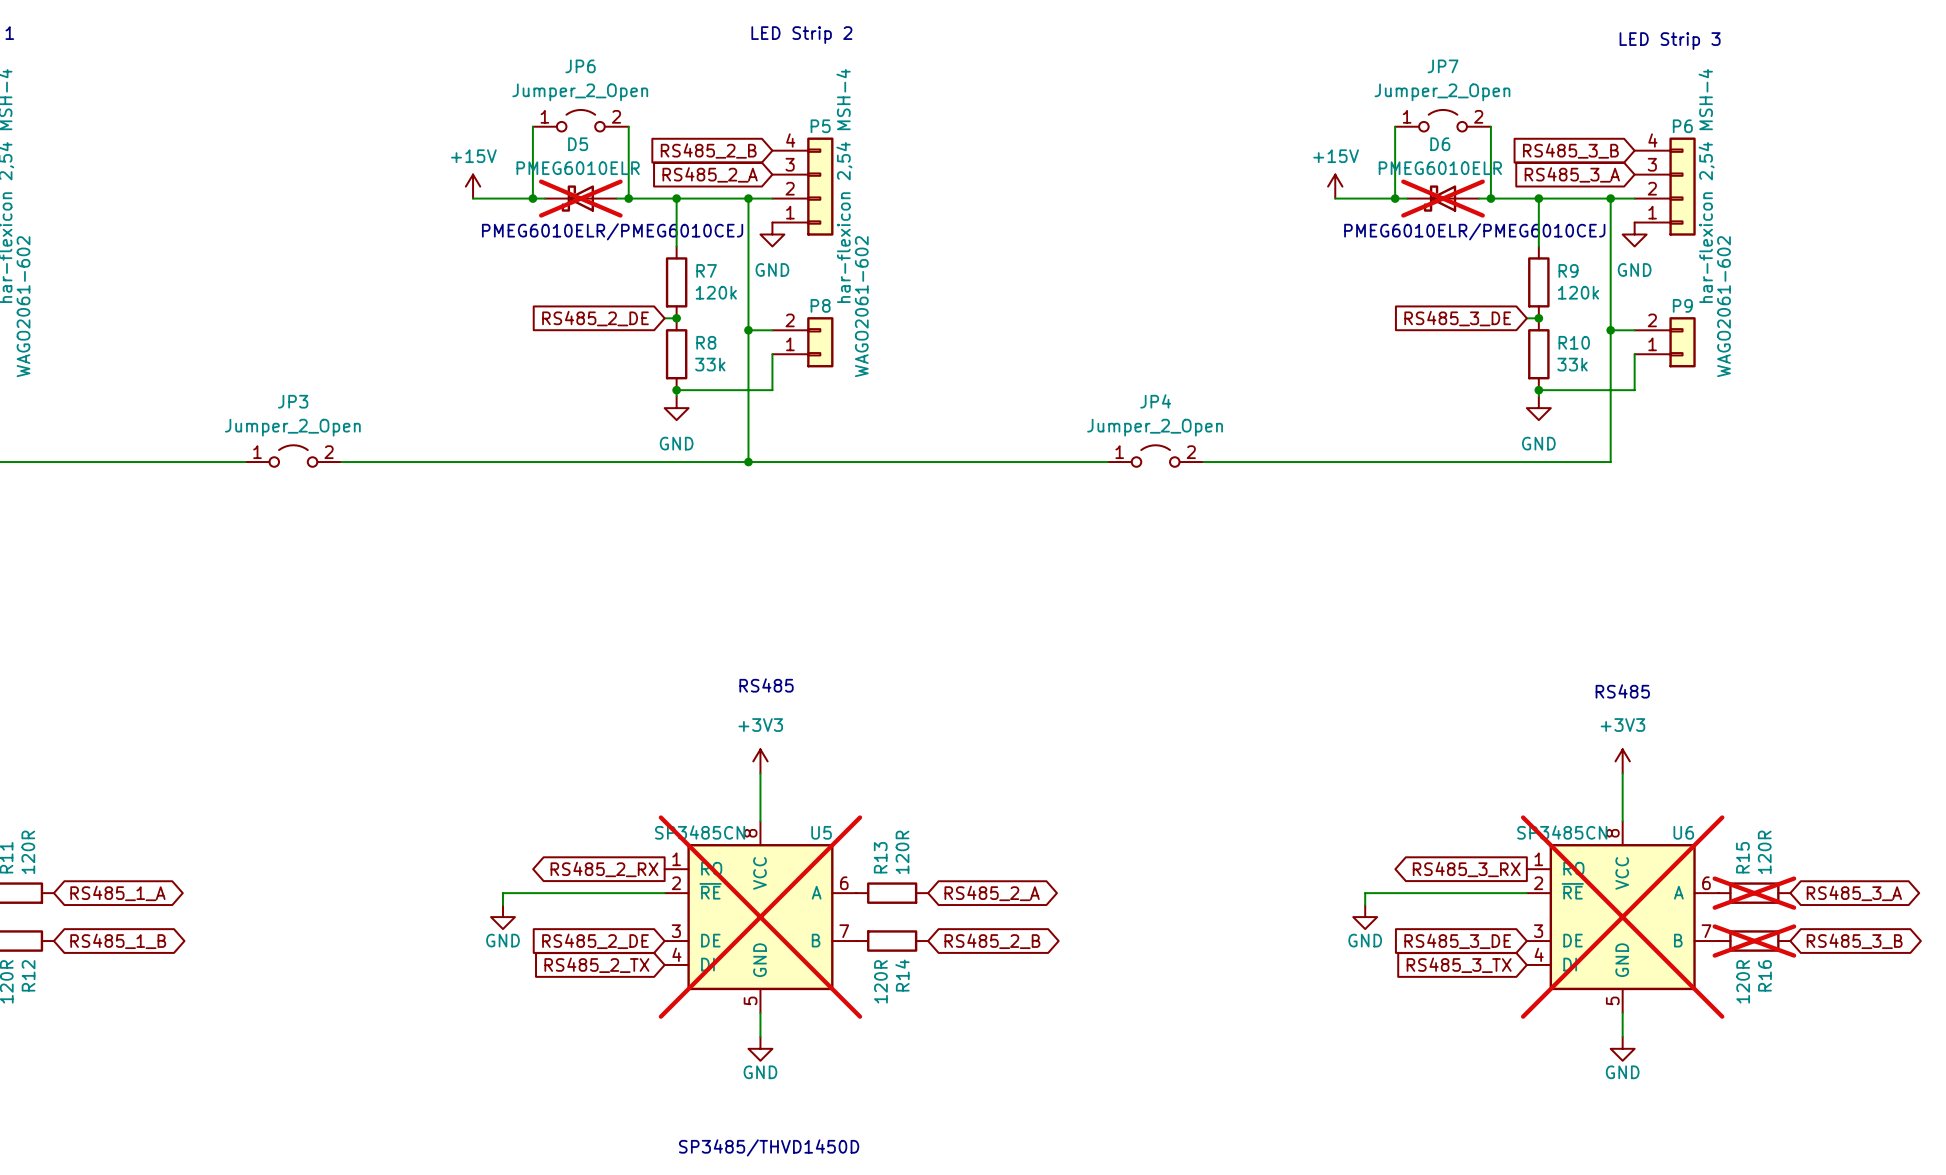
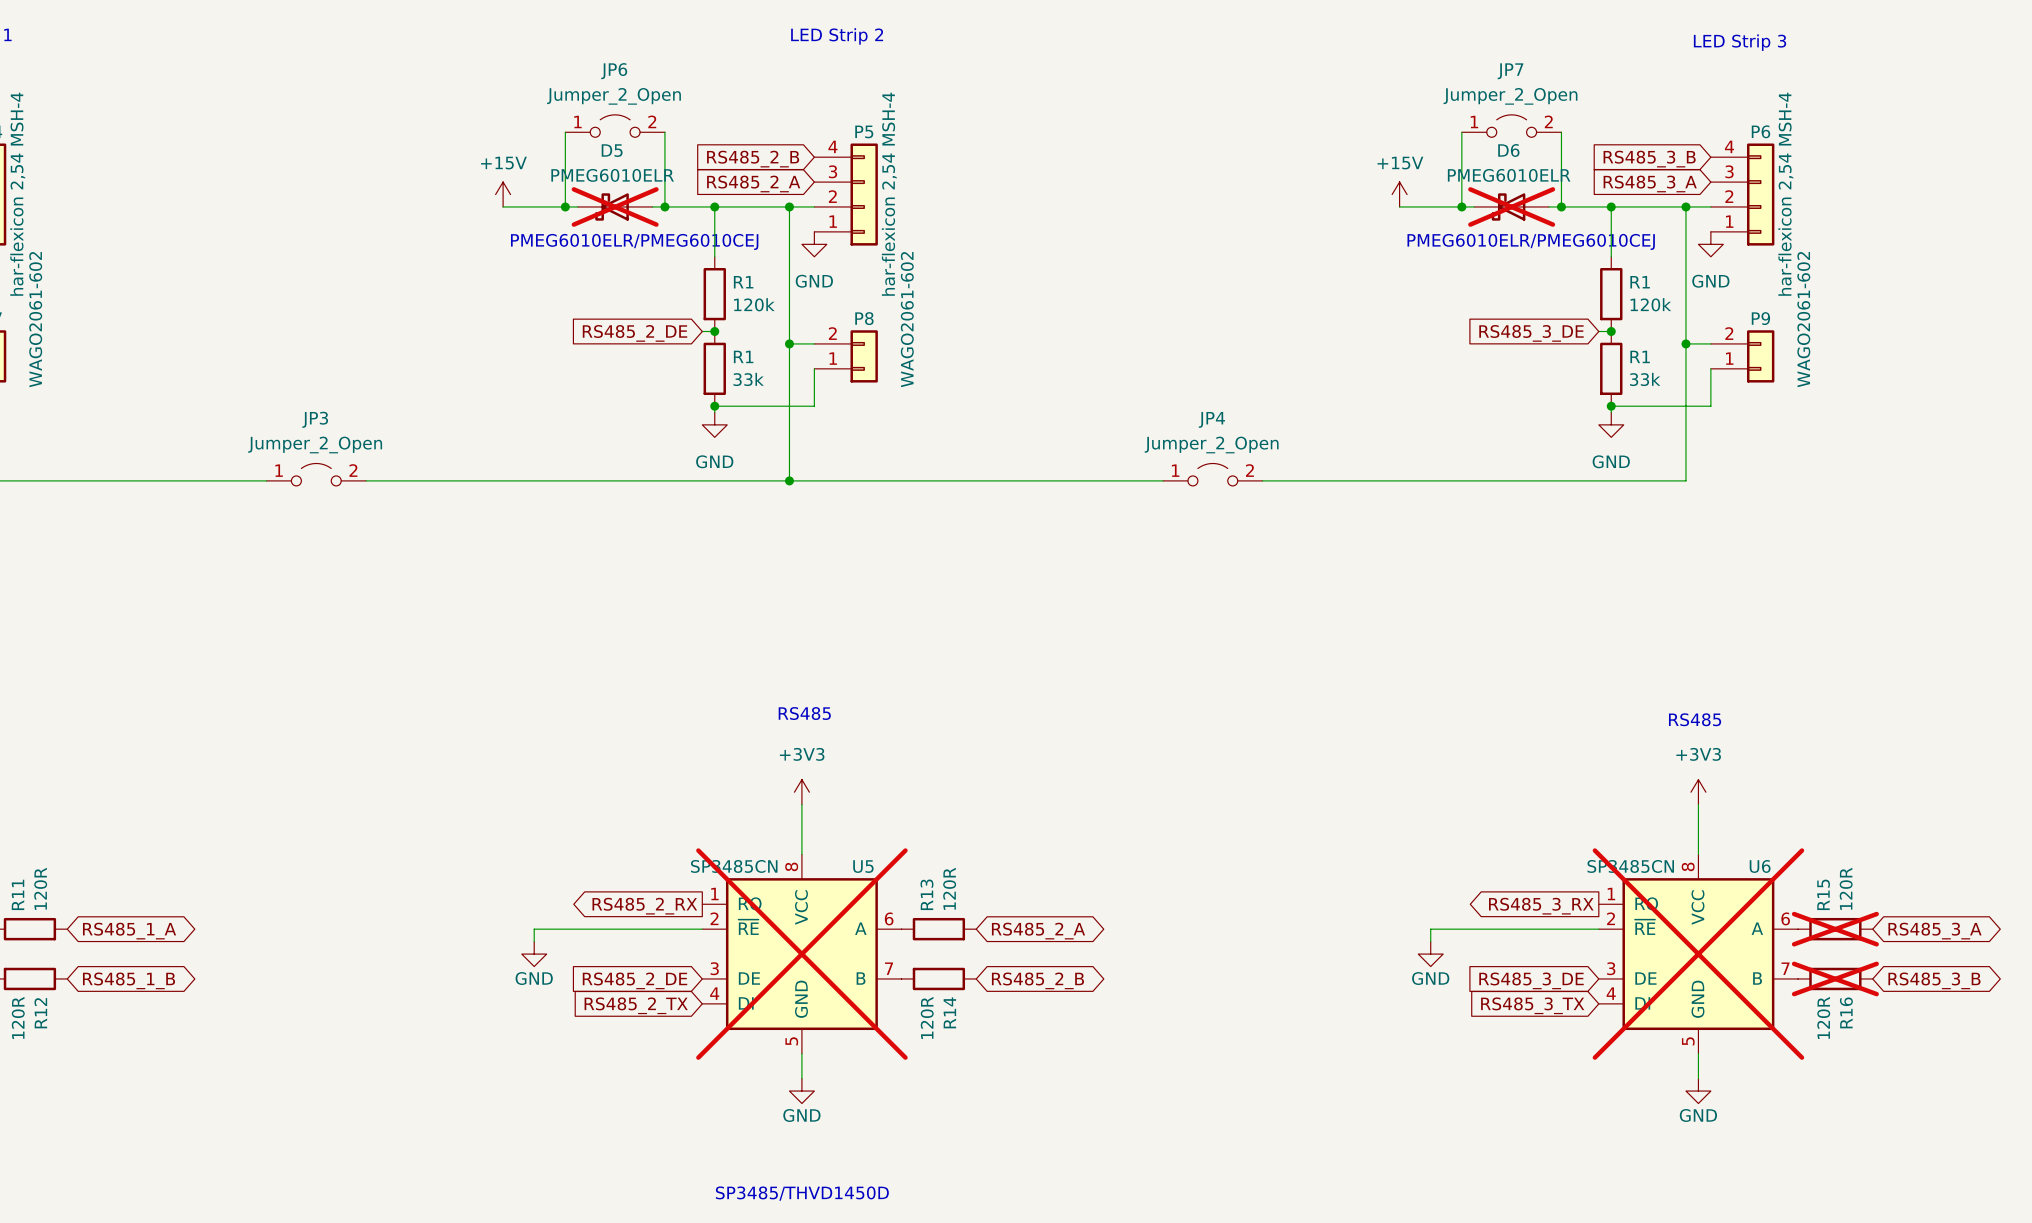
R7 name: R7 (706, 270) -> R1 (743, 282)
R9 name: R9 (1568, 270) -> R1 (1640, 282)
R8 name: R8 (706, 342) -> R1 (743, 356)
R10 name: R10 (1574, 342) -> R1 (1640, 356)

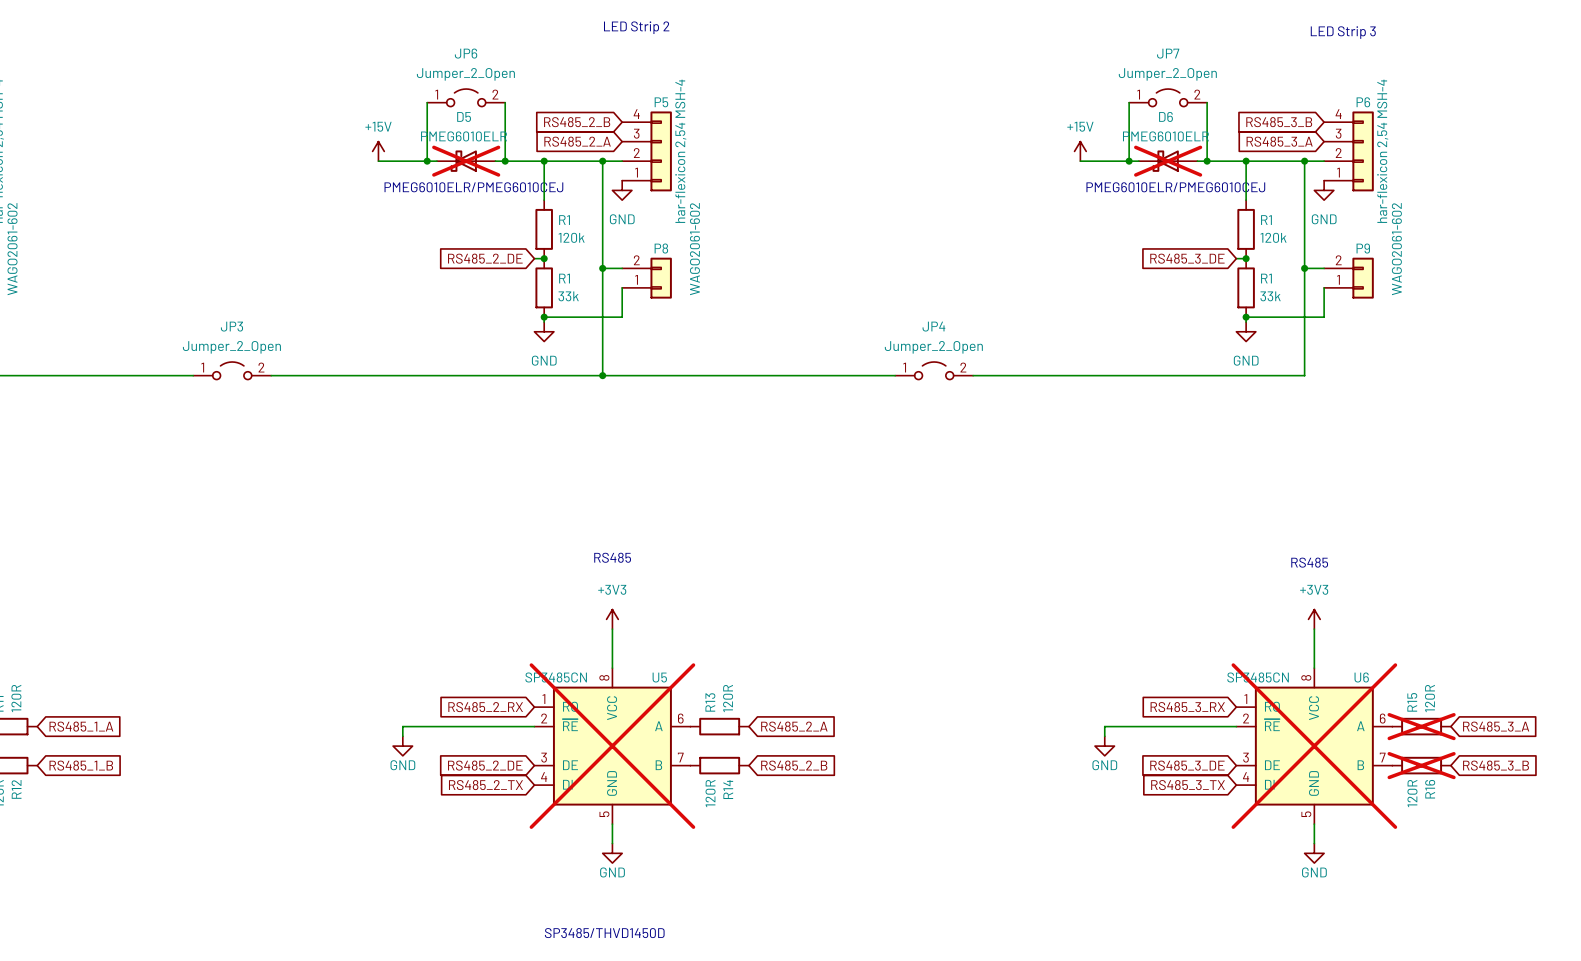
global label shape: output (644, 906) -> input (485, 707)
global label shape: output (1541, 906) -> input (1187, 707)
global label shape: bidirectional (129, 931) -> input (81, 726)
global label shape: bidirectional (1038, 931) -> input (794, 726)
global label shape: bidirectional (1934, 931) -> input (1496, 726)
global label shape: bidirectional (129, 980) -> input (81, 765)
global label shape: bidirectional (1037, 980) -> input (794, 765)
global label shape: bidirectional (1934, 980) -> input (1496, 765)

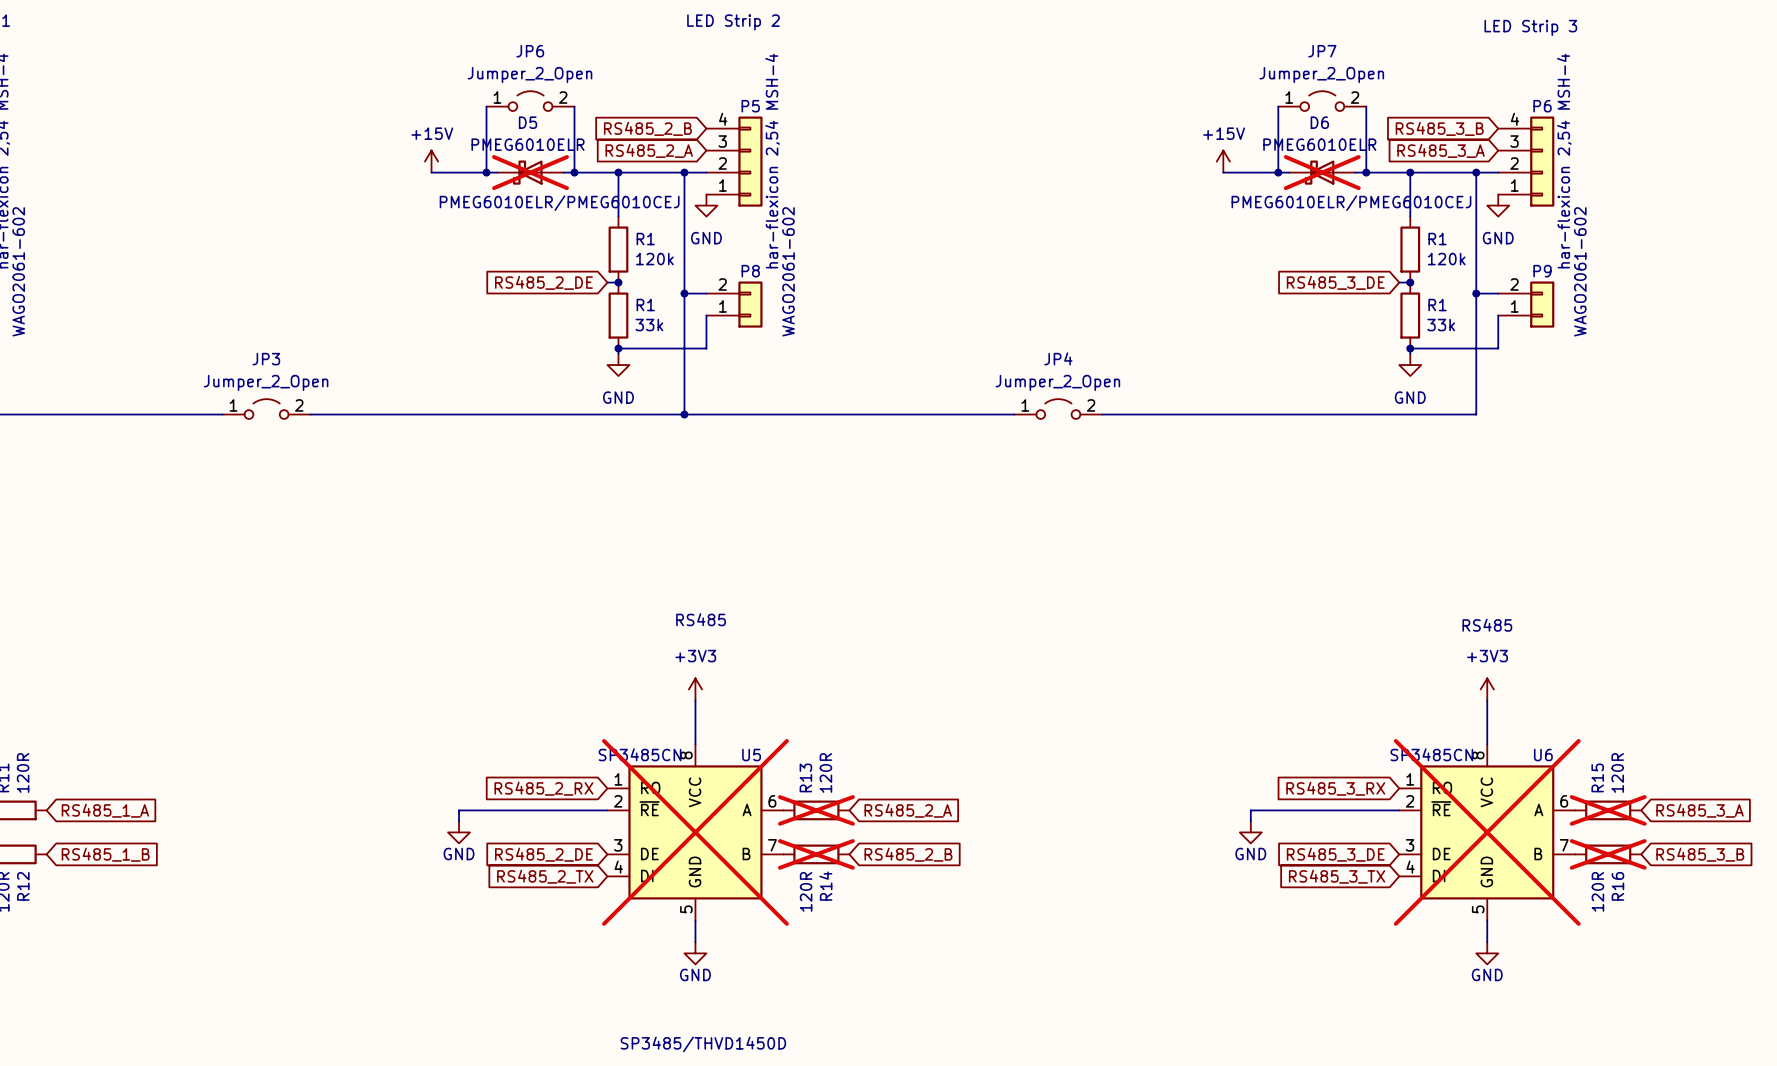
R13 do-not-place cross: none -> (816, 810)
R14 do-not-place cross: none -> (816, 854)

